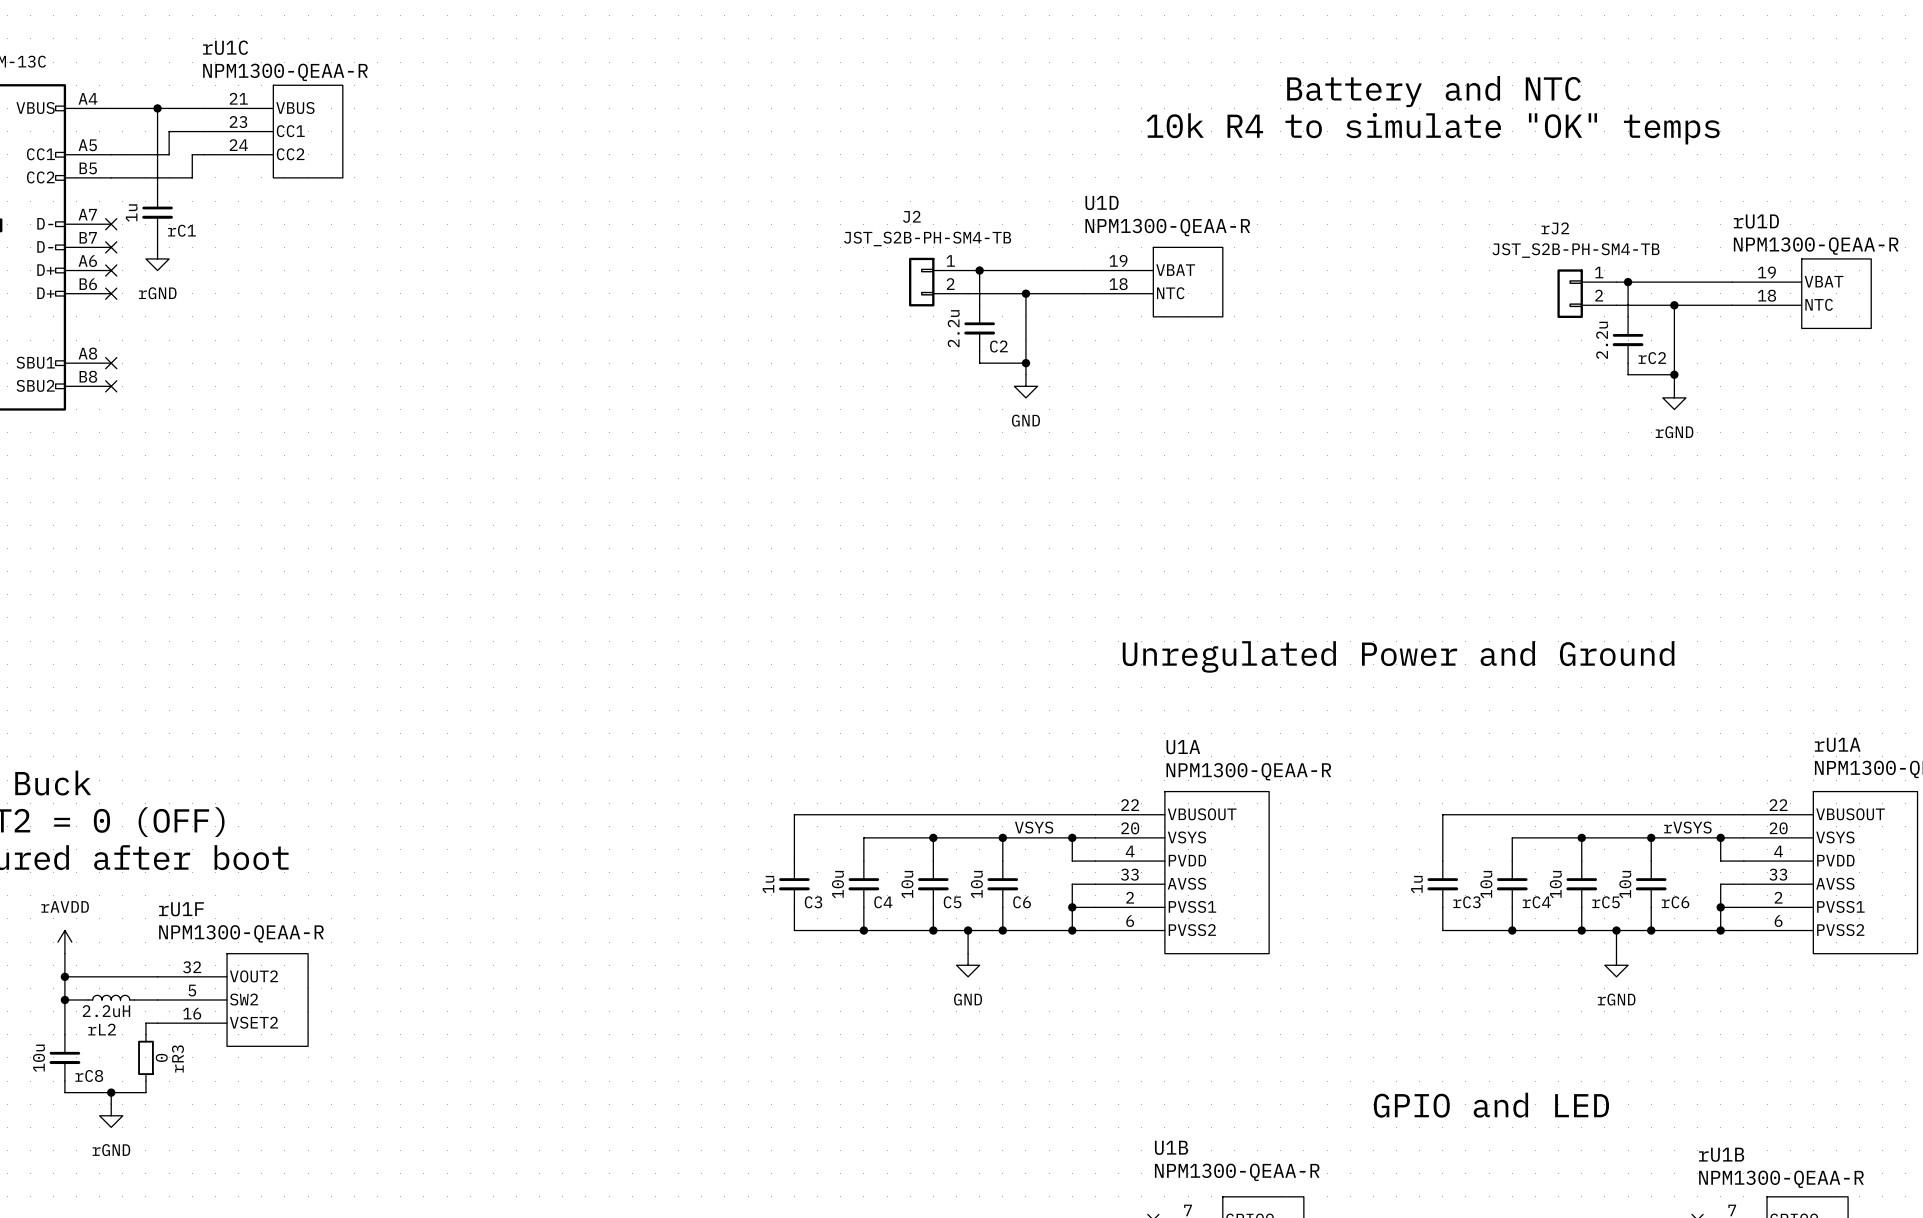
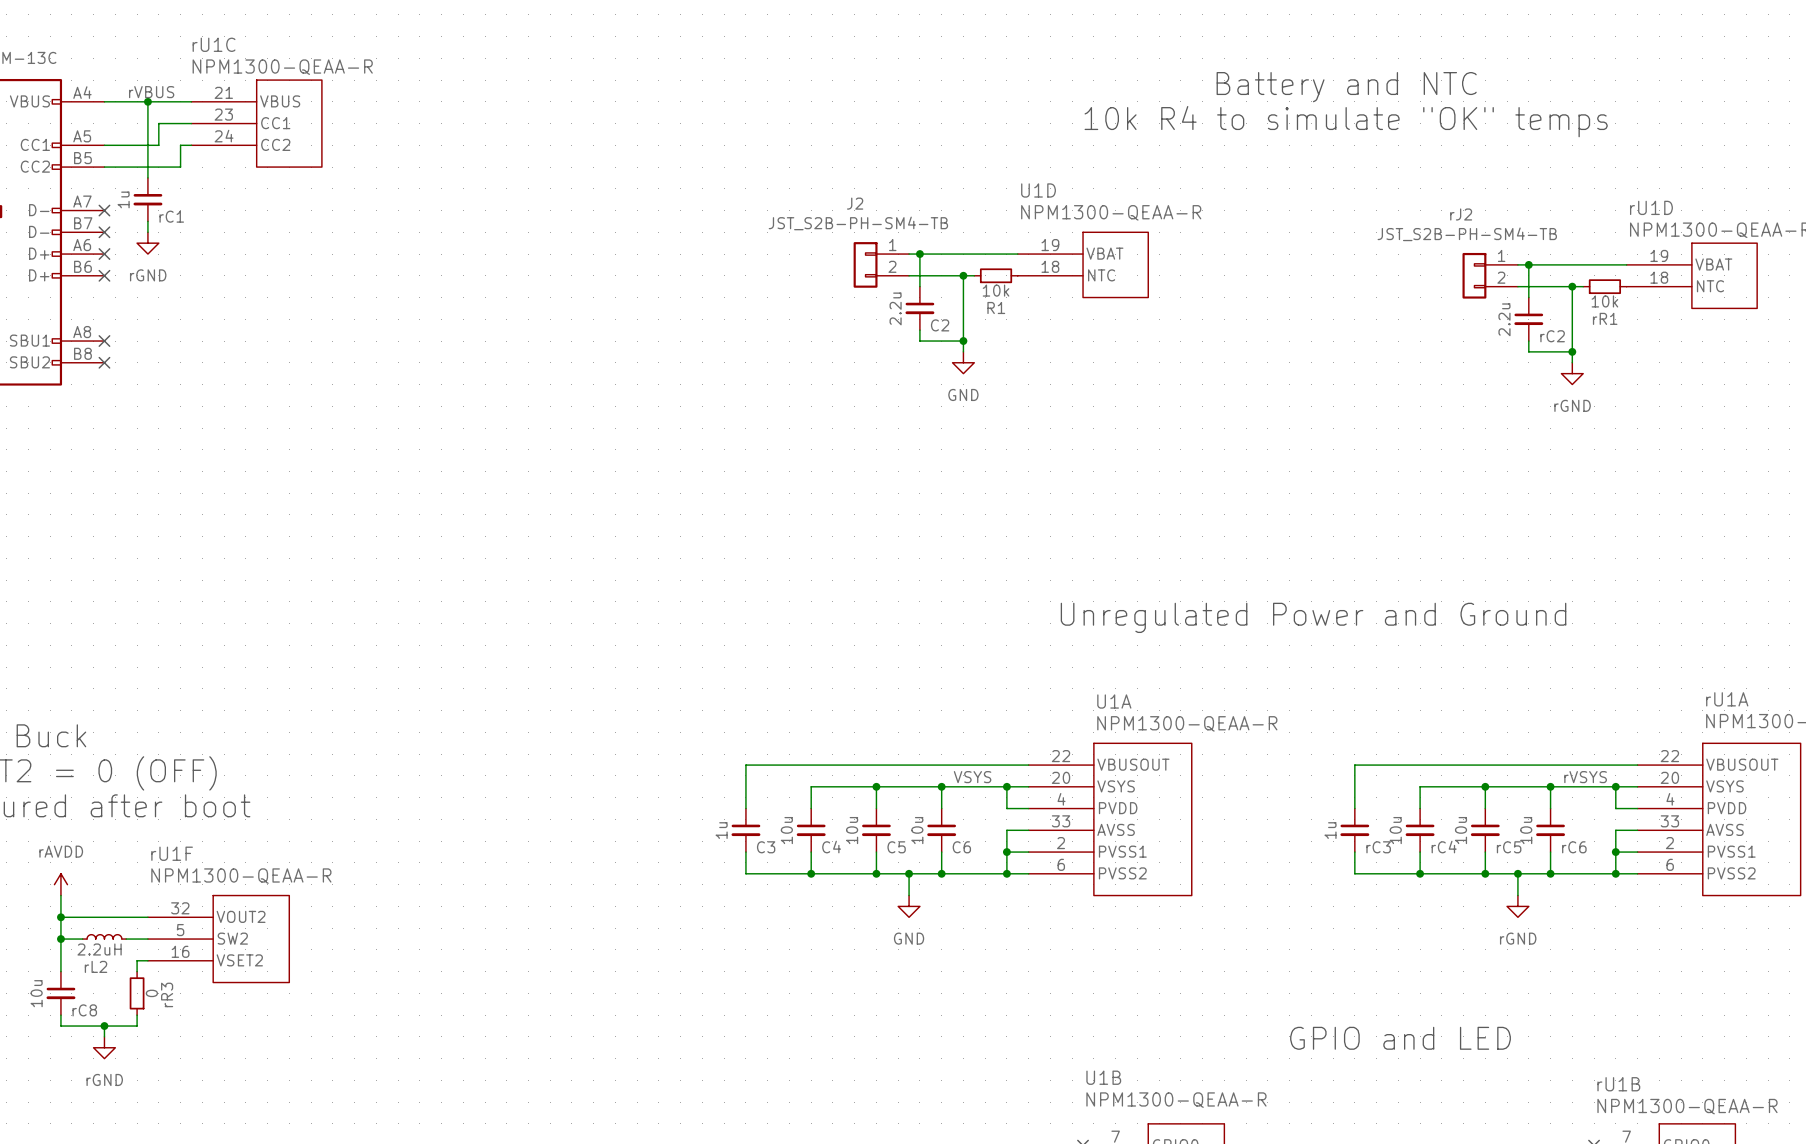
label: none -> rVBUS (151, 92)
wire: (1037, 293) (1083, 293) -> none
R1: none -> 10k (996, 275)
wire: (1685, 305) (1732, 305) -> none
rR1: none -> 10k (1604, 286)

